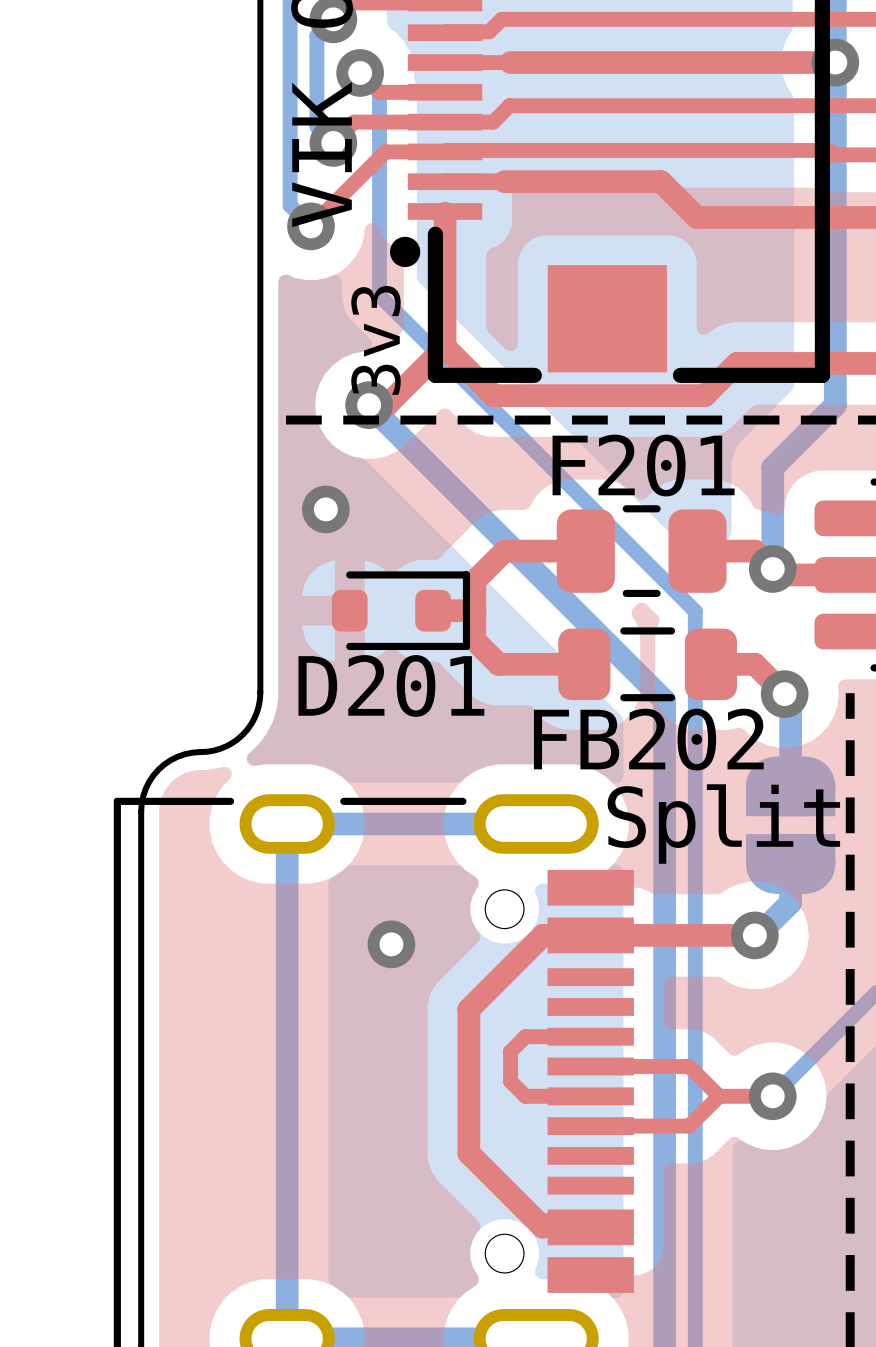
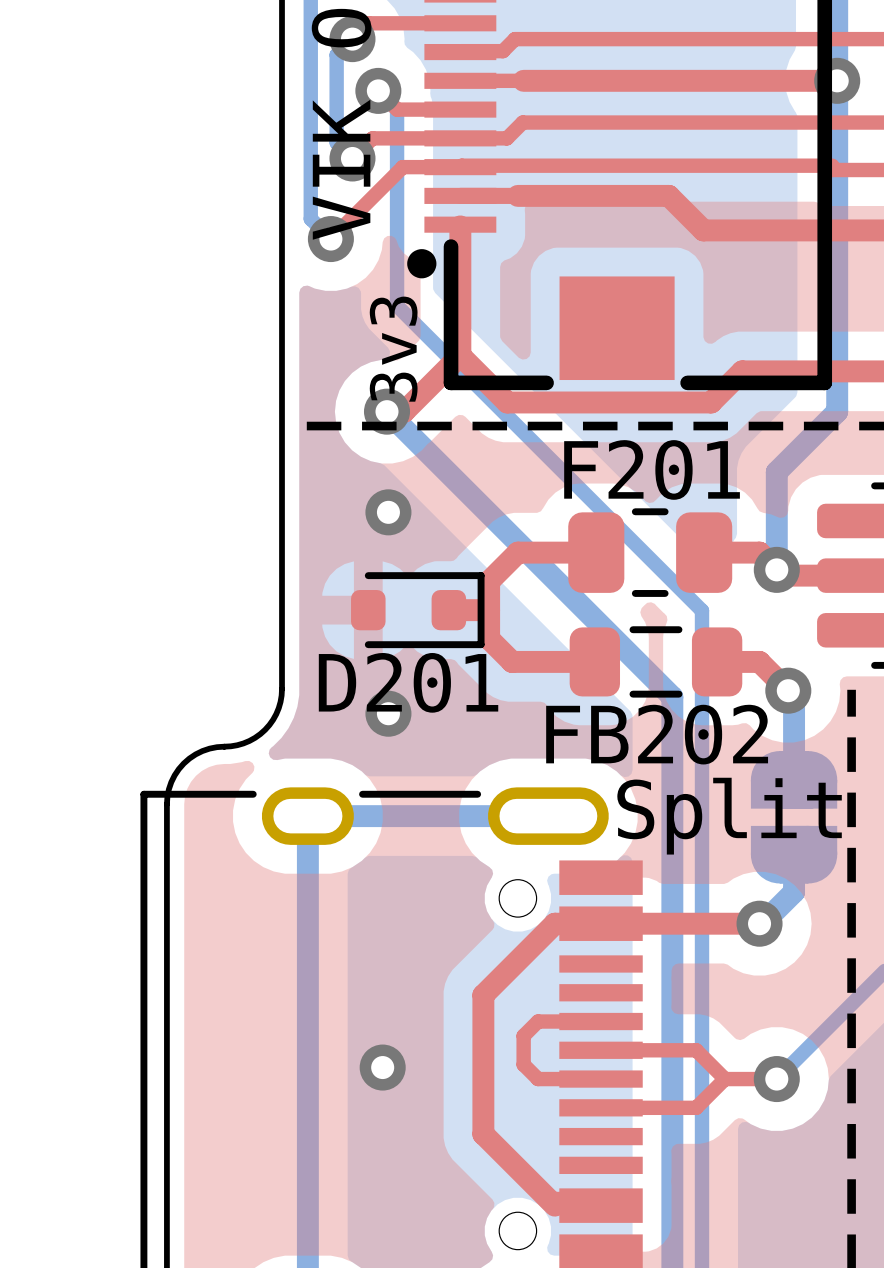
via position: (325, 509) -> (388, 512)
via: none -> (388, 713)
via: (391, 944) -> none
via: none -> (382, 1067)

